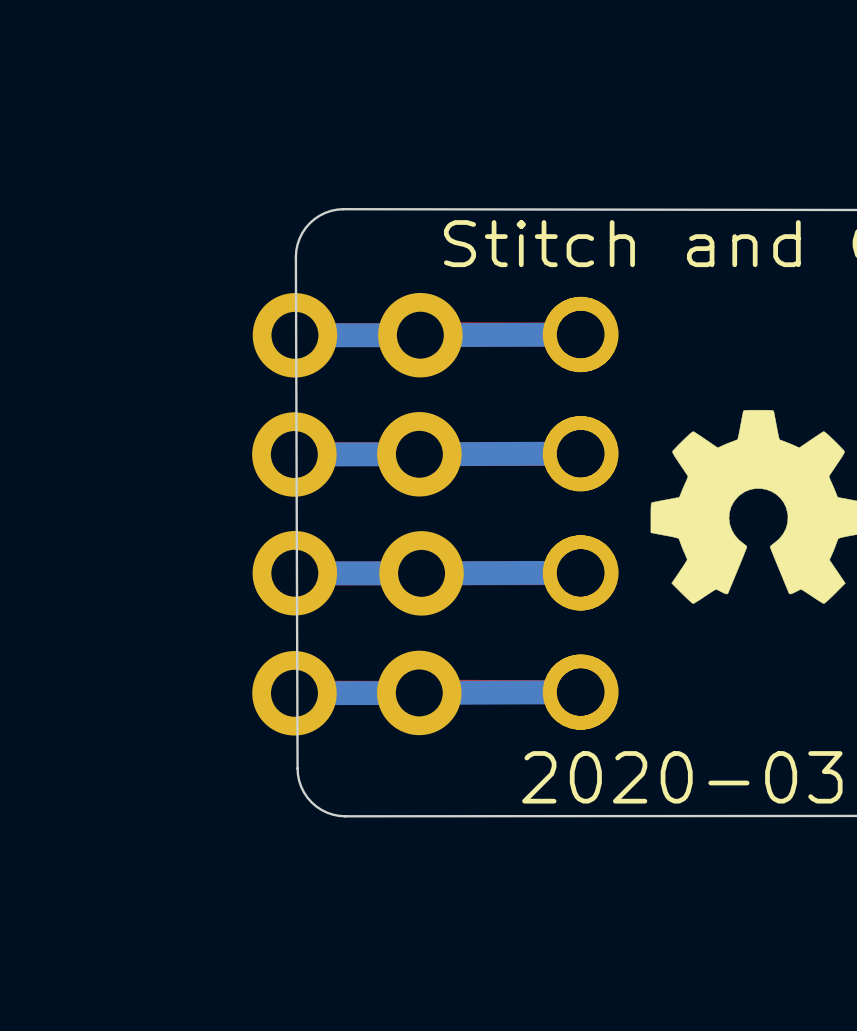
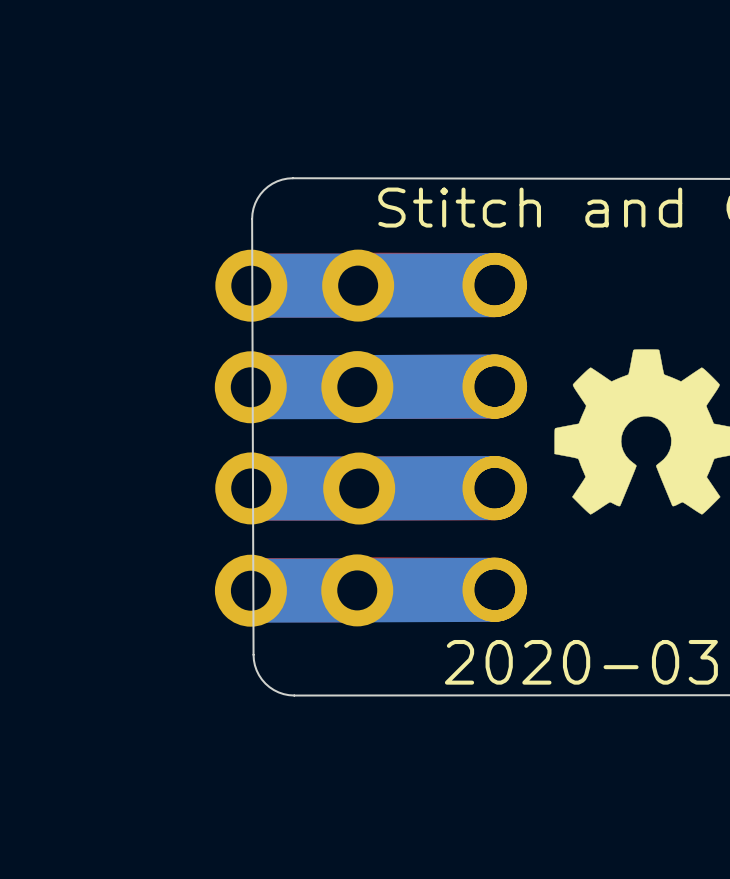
bottom track width: thin (580, 334) (294, 335) -> thick (494, 285) (251, 285)
bottom track width: thin (581, 453) (294, 454) -> thick (495, 386) (250, 387)
bottom track width: thin (581, 572) (294, 573) -> thick (495, 488) (251, 488)
bottom track width: thin (580, 692) (294, 693) -> thick (494, 589) (250, 590)

